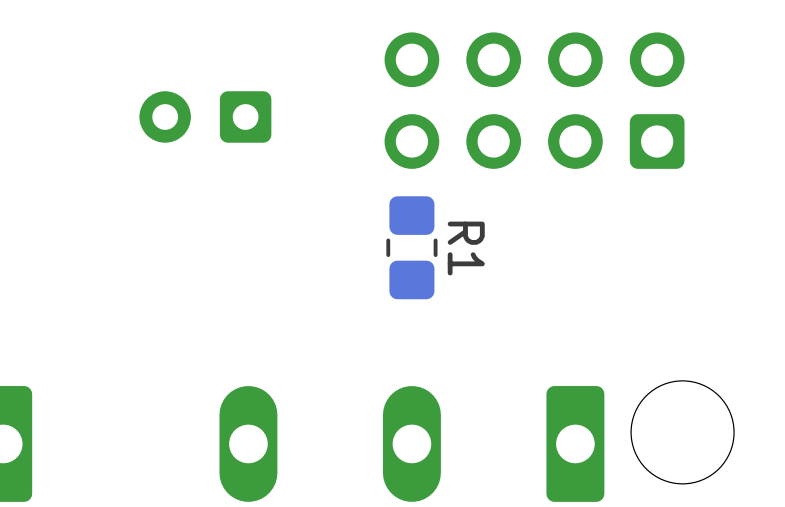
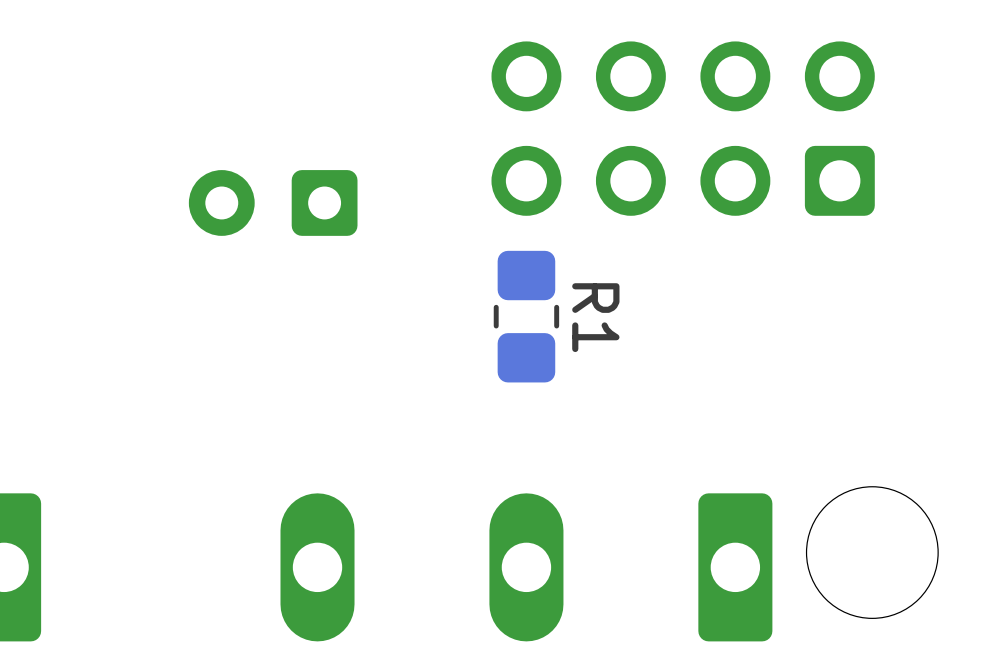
part position: (205, 116) -> (273, 202)

